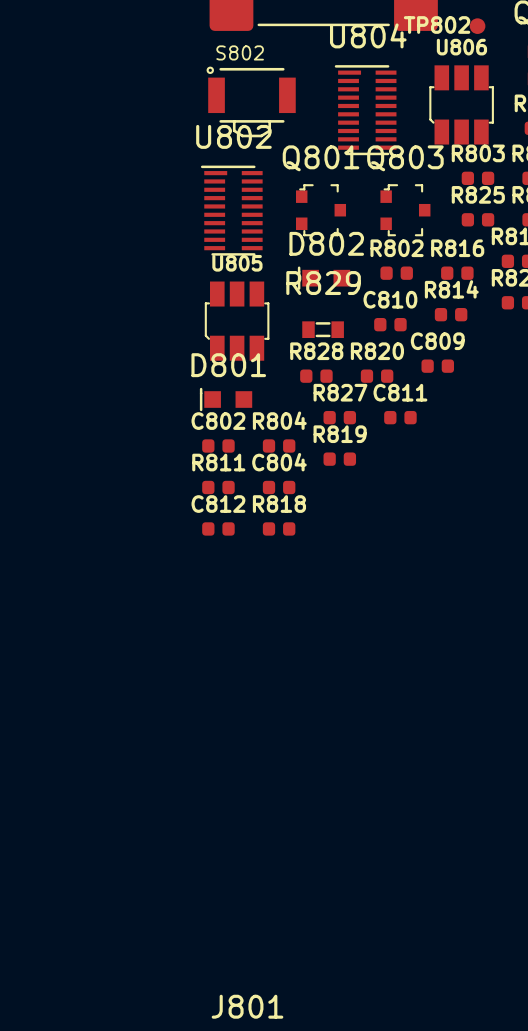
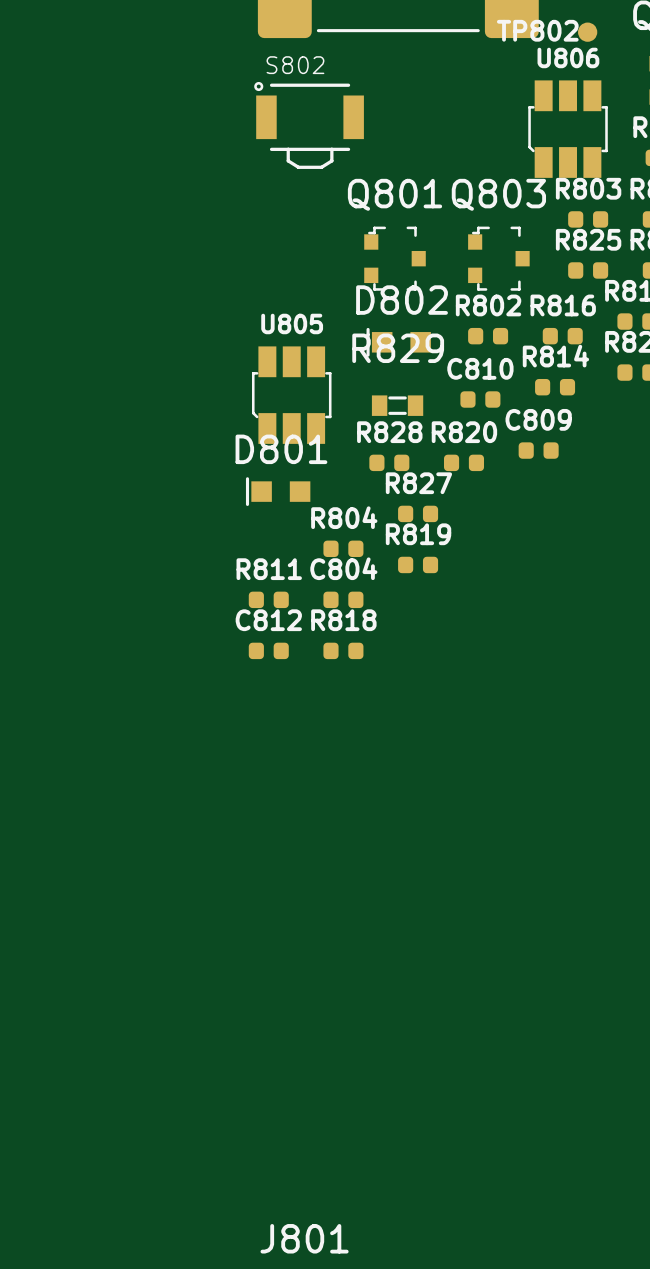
U804: (365, 110) -> none
U802: (231, 210) -> none
C811: (400, 417) -> none
C802: (218, 445) -> none

